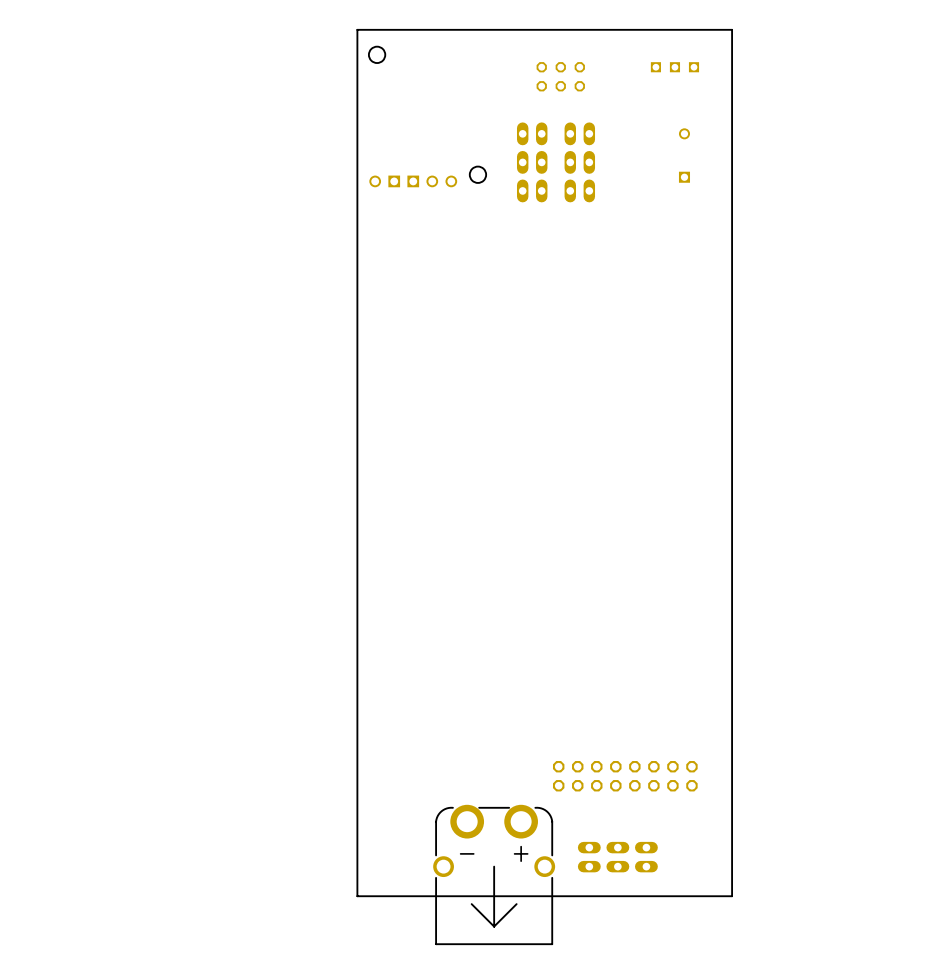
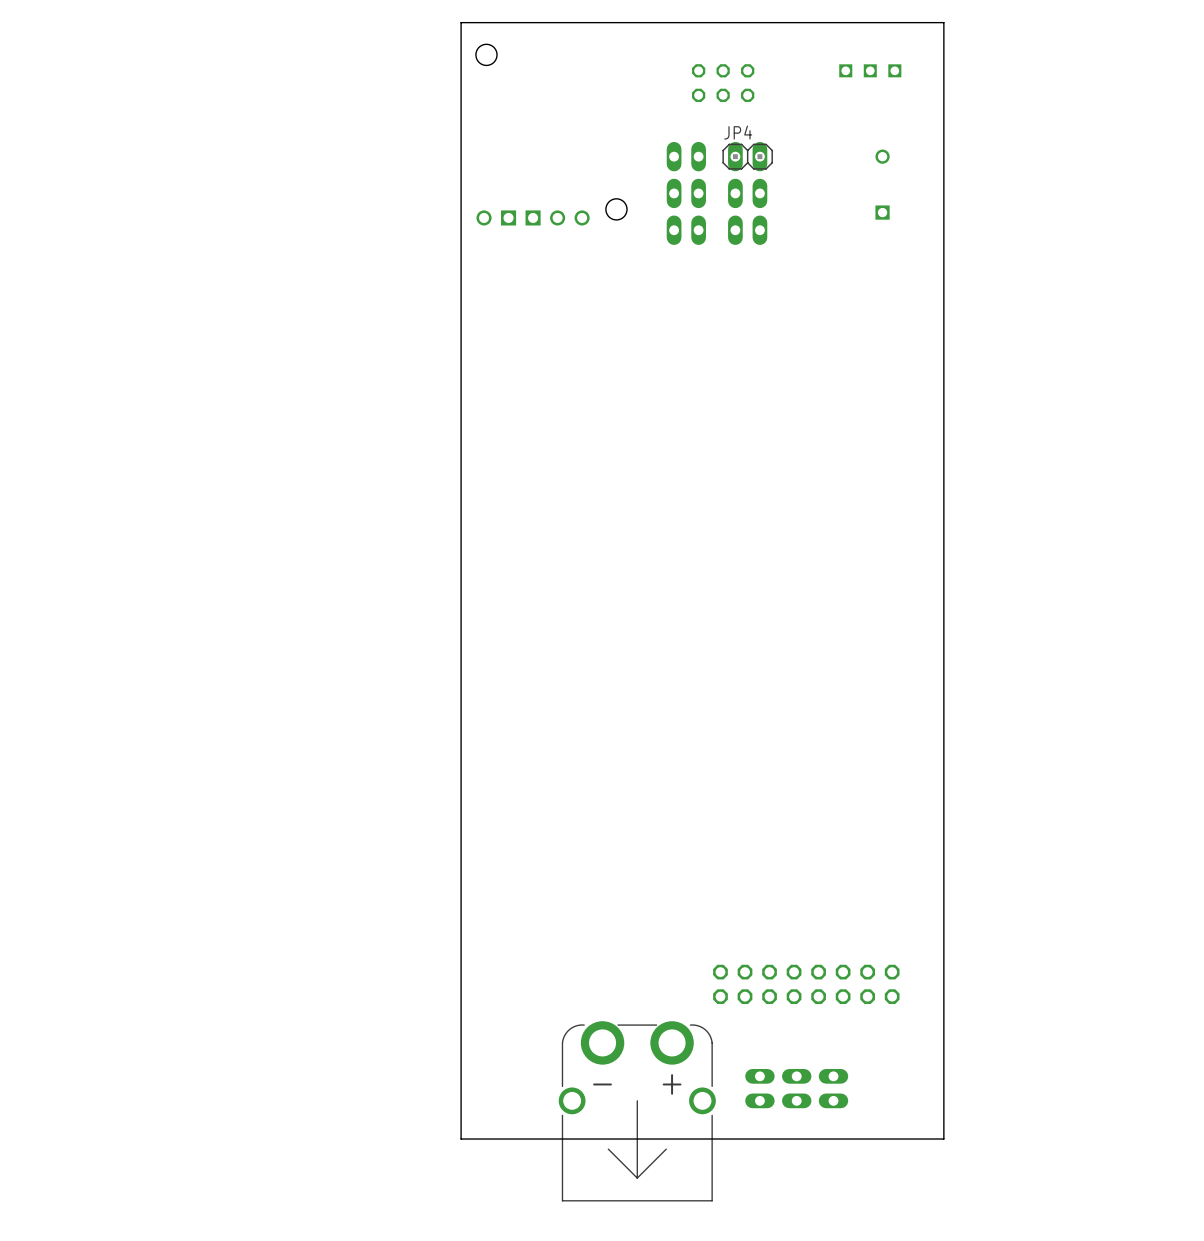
JP4 side: top (579, 133) -> bottom (747, 156)

